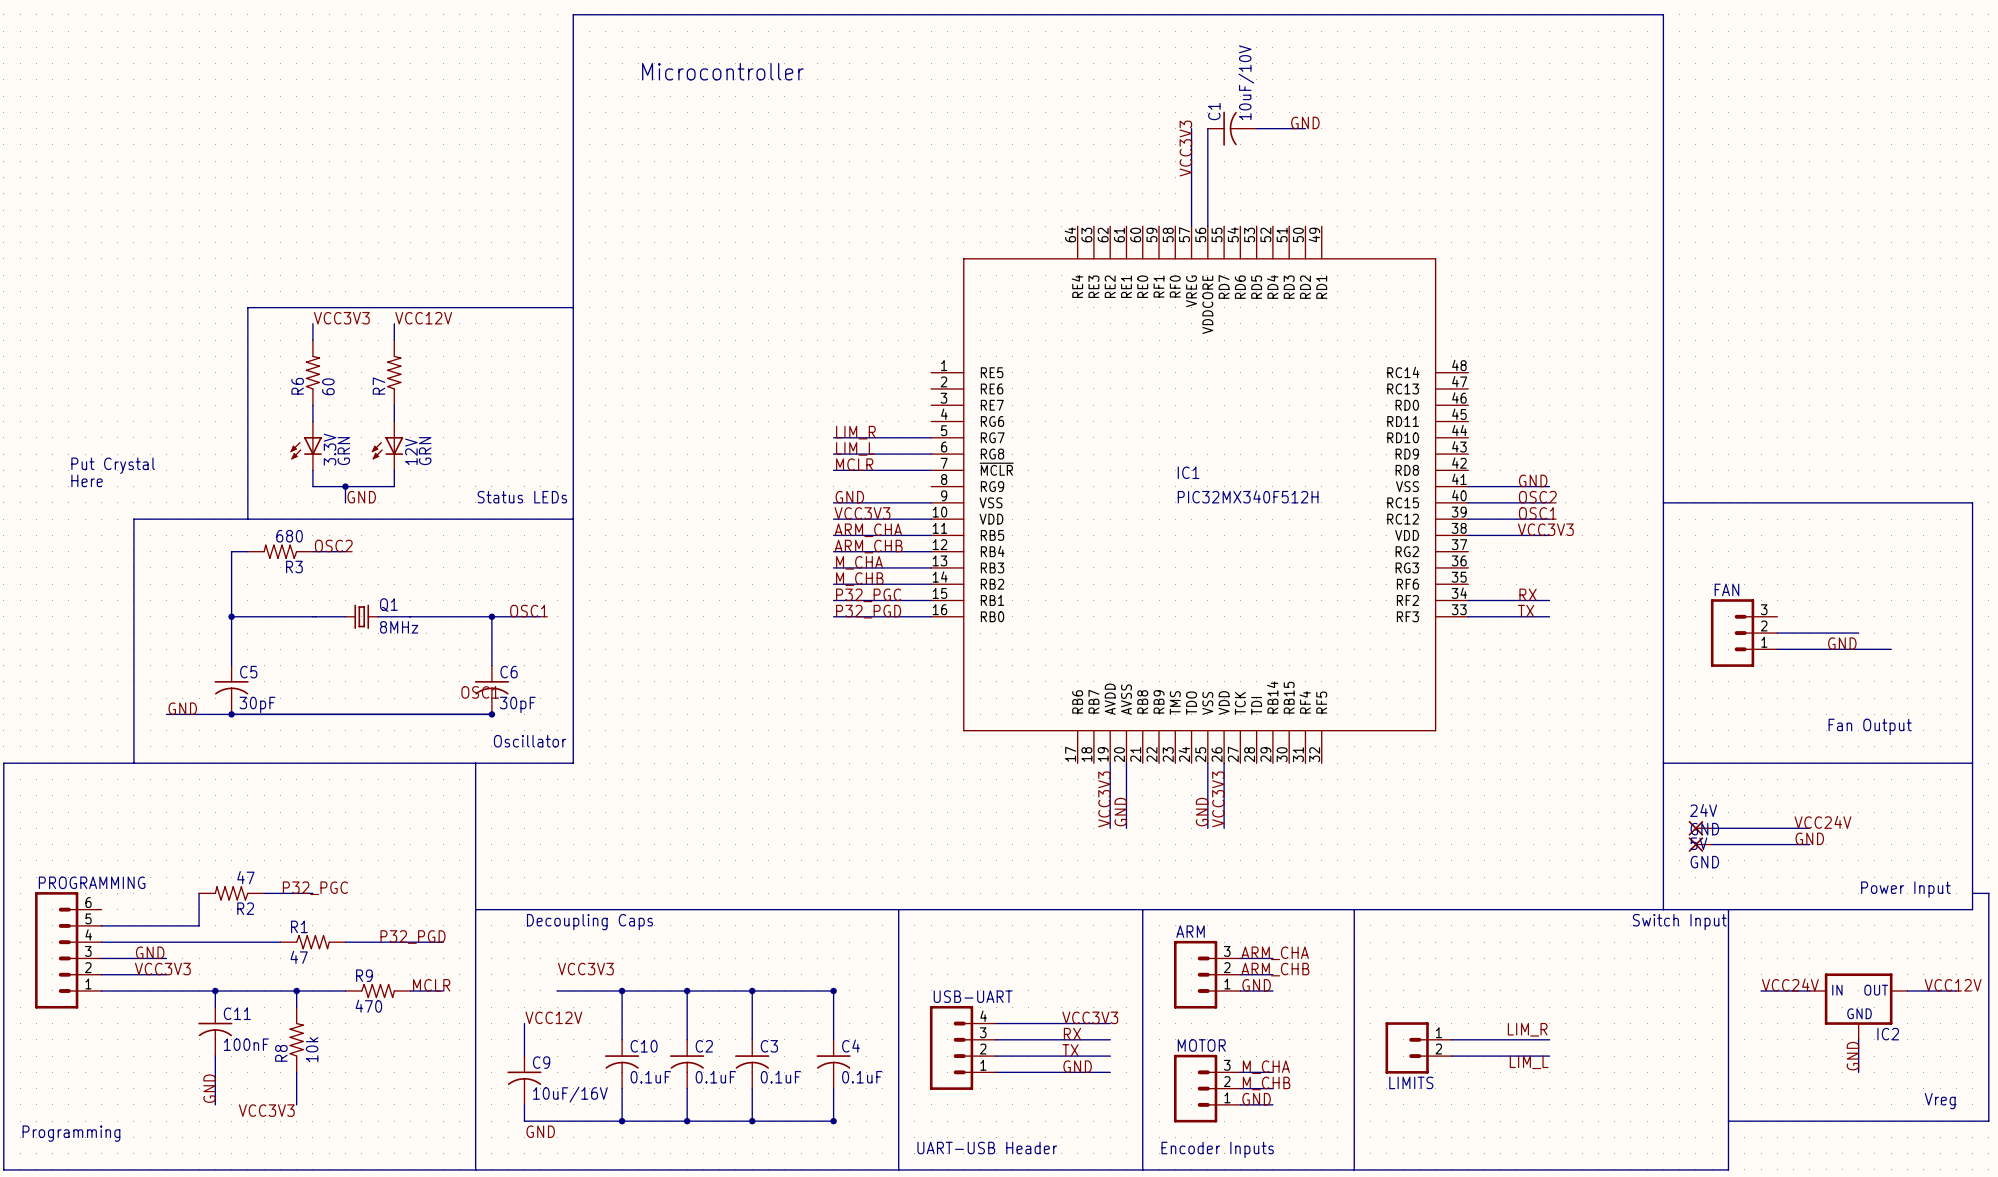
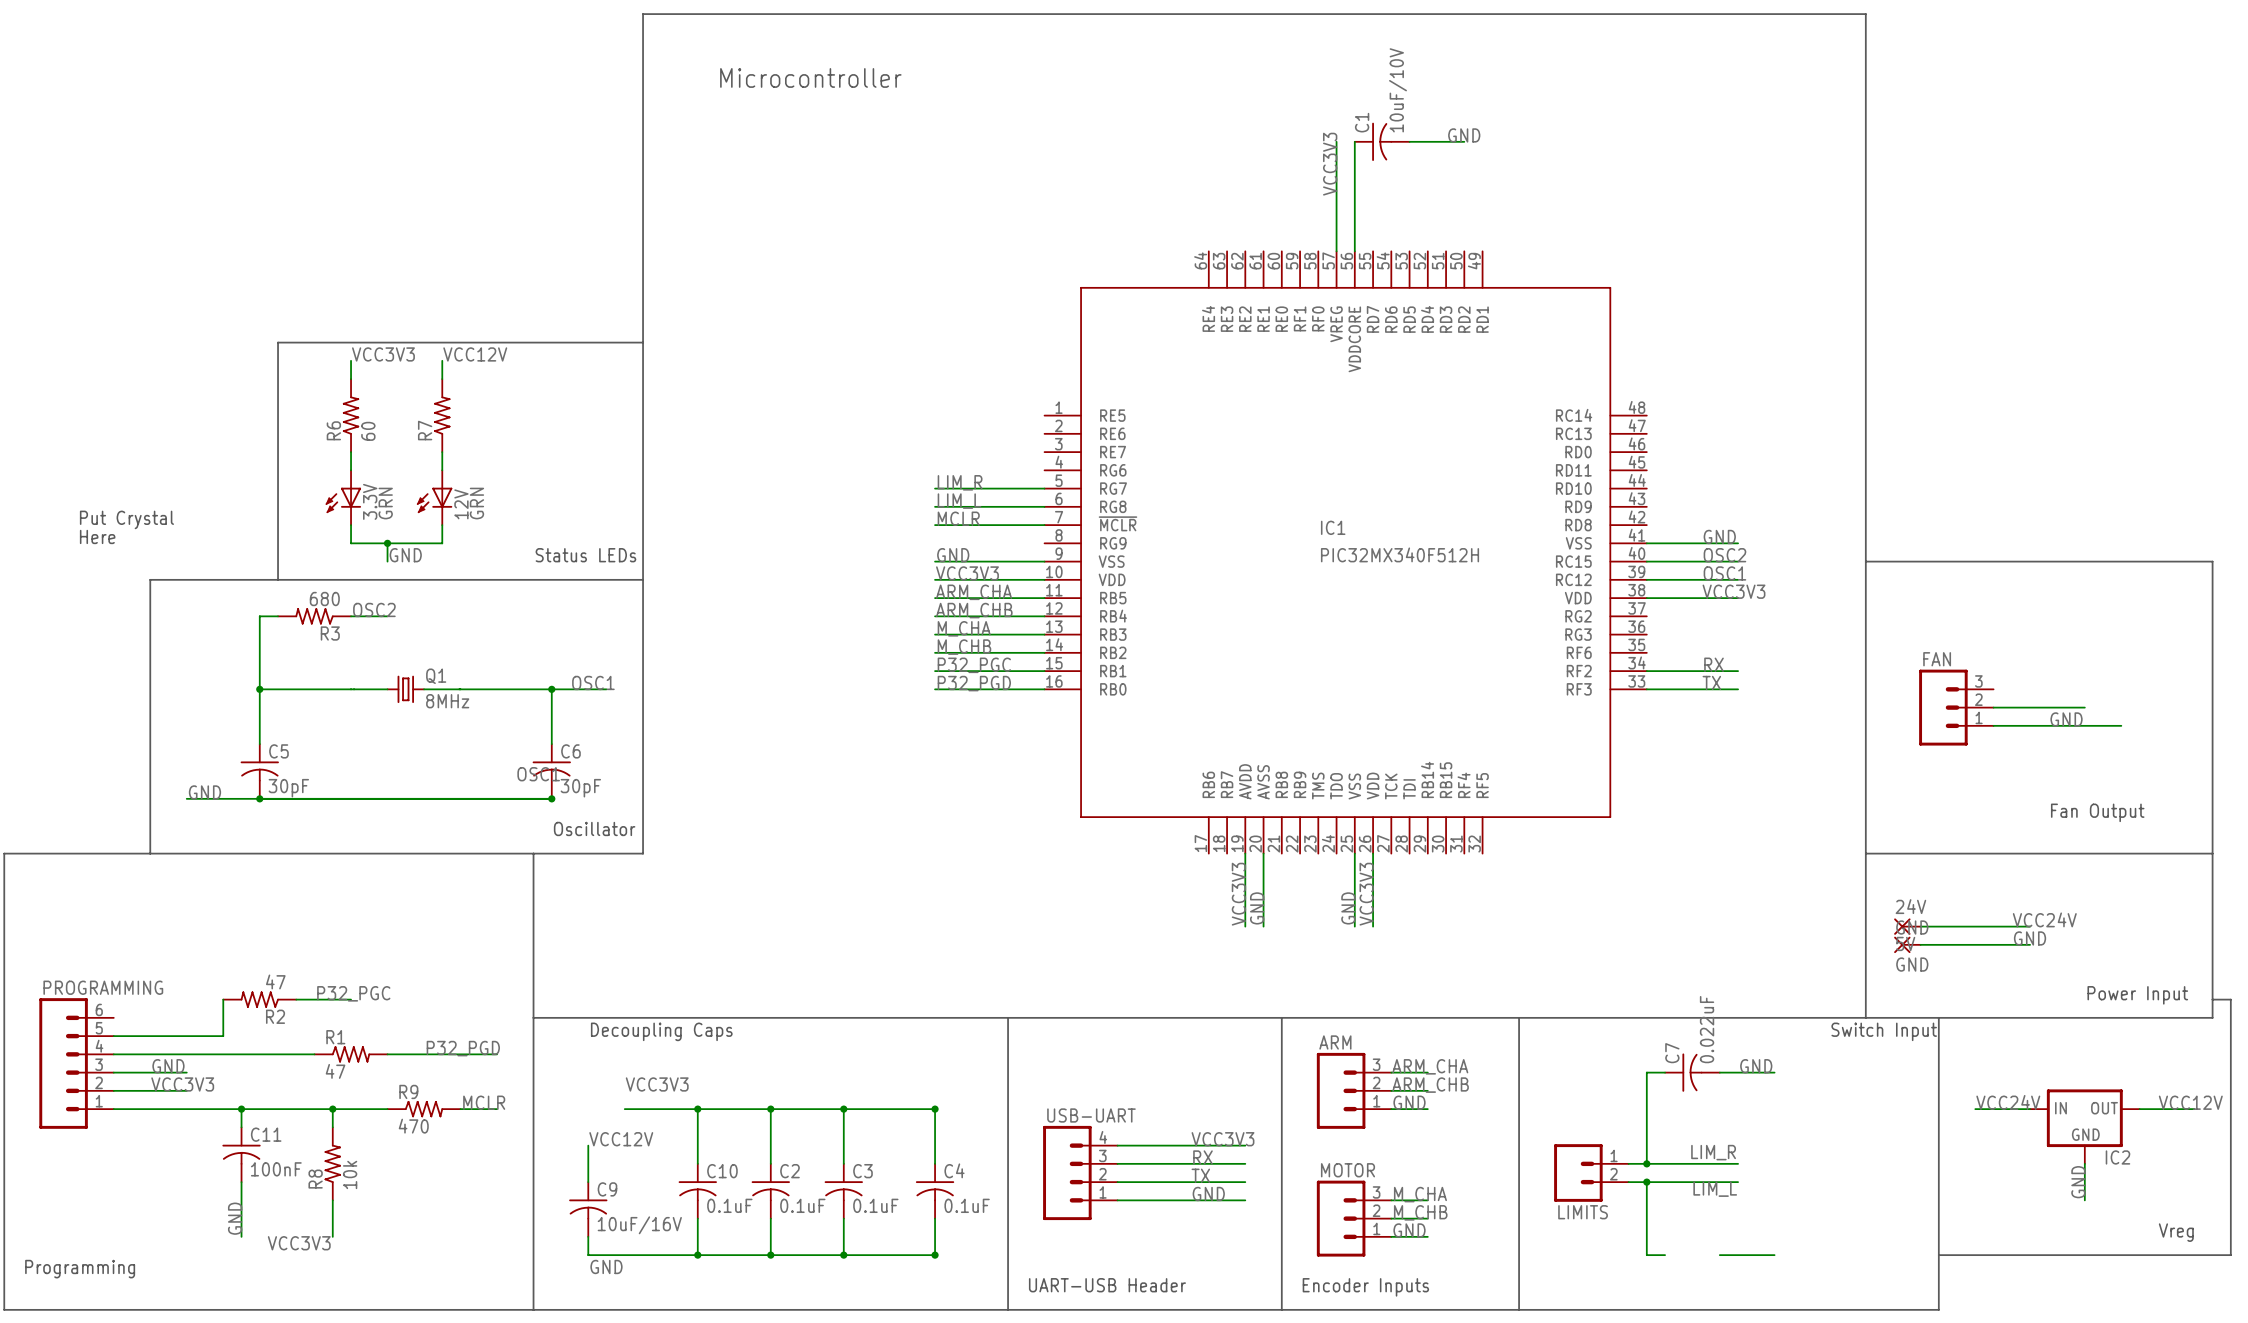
label: none -> GND (1756, 1066)
wire: none -> (1665, 1072) (1646, 1072) (1646, 1163)
C7: none -> 0.022uF (1692, 1072)
wire: none -> (1719, 1072) (1774, 1072)
junction: none -> (1646, 1163)
wire: none -> (1646, 1182) (1646, 1255) (1665, 1255)
junction: none -> (1646, 1182)
wire: none -> (1719, 1255) (1774, 1255)

